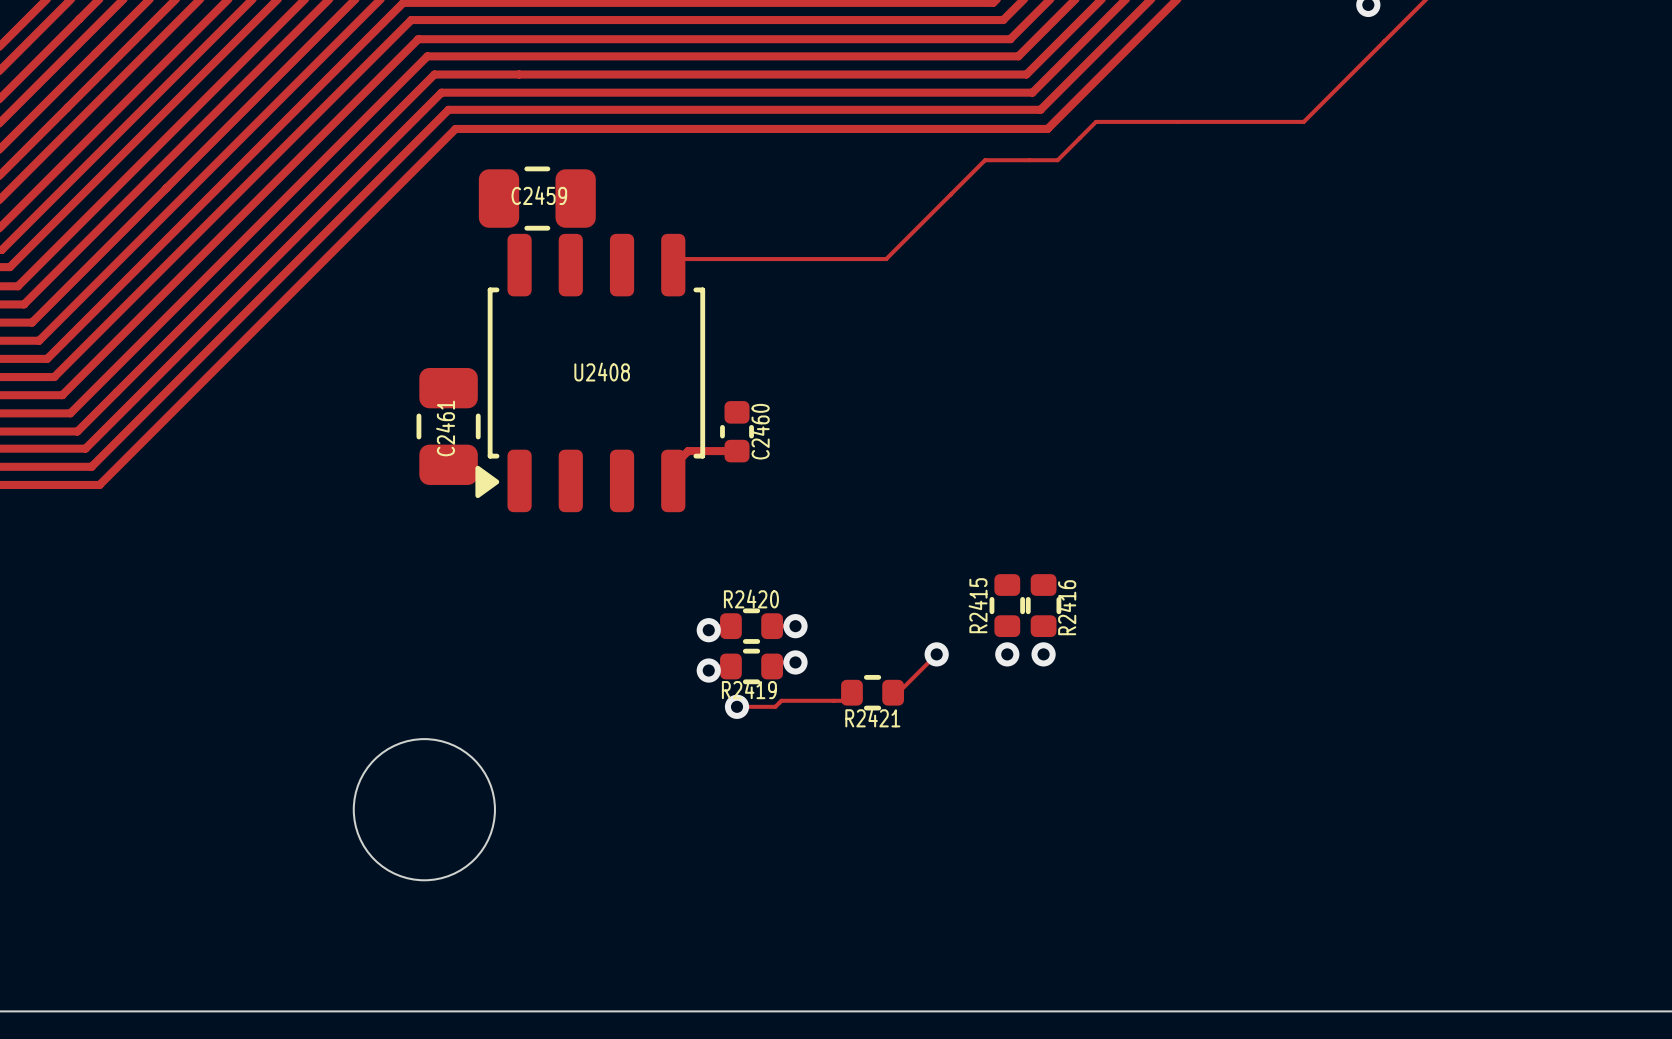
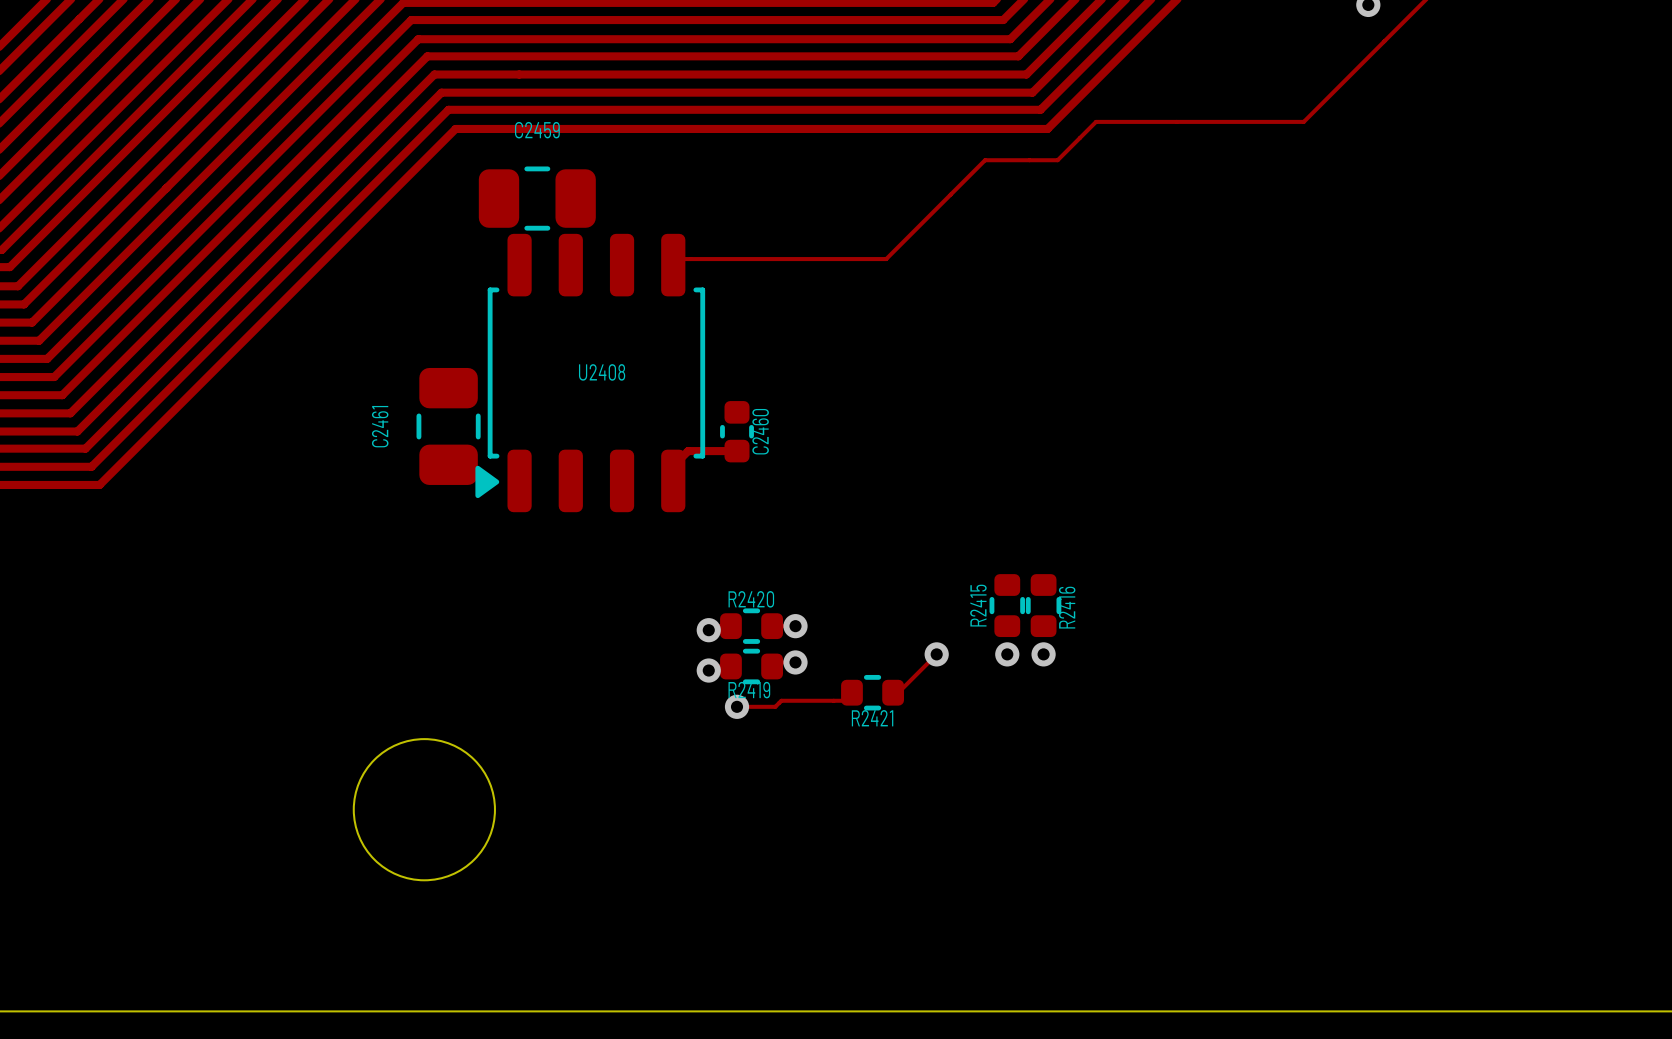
C2459 name position: C2459 (539, 195) -> C2459 (537, 130)
C2461 name position: C2461 (445, 428) -> C2461 (380, 426)

